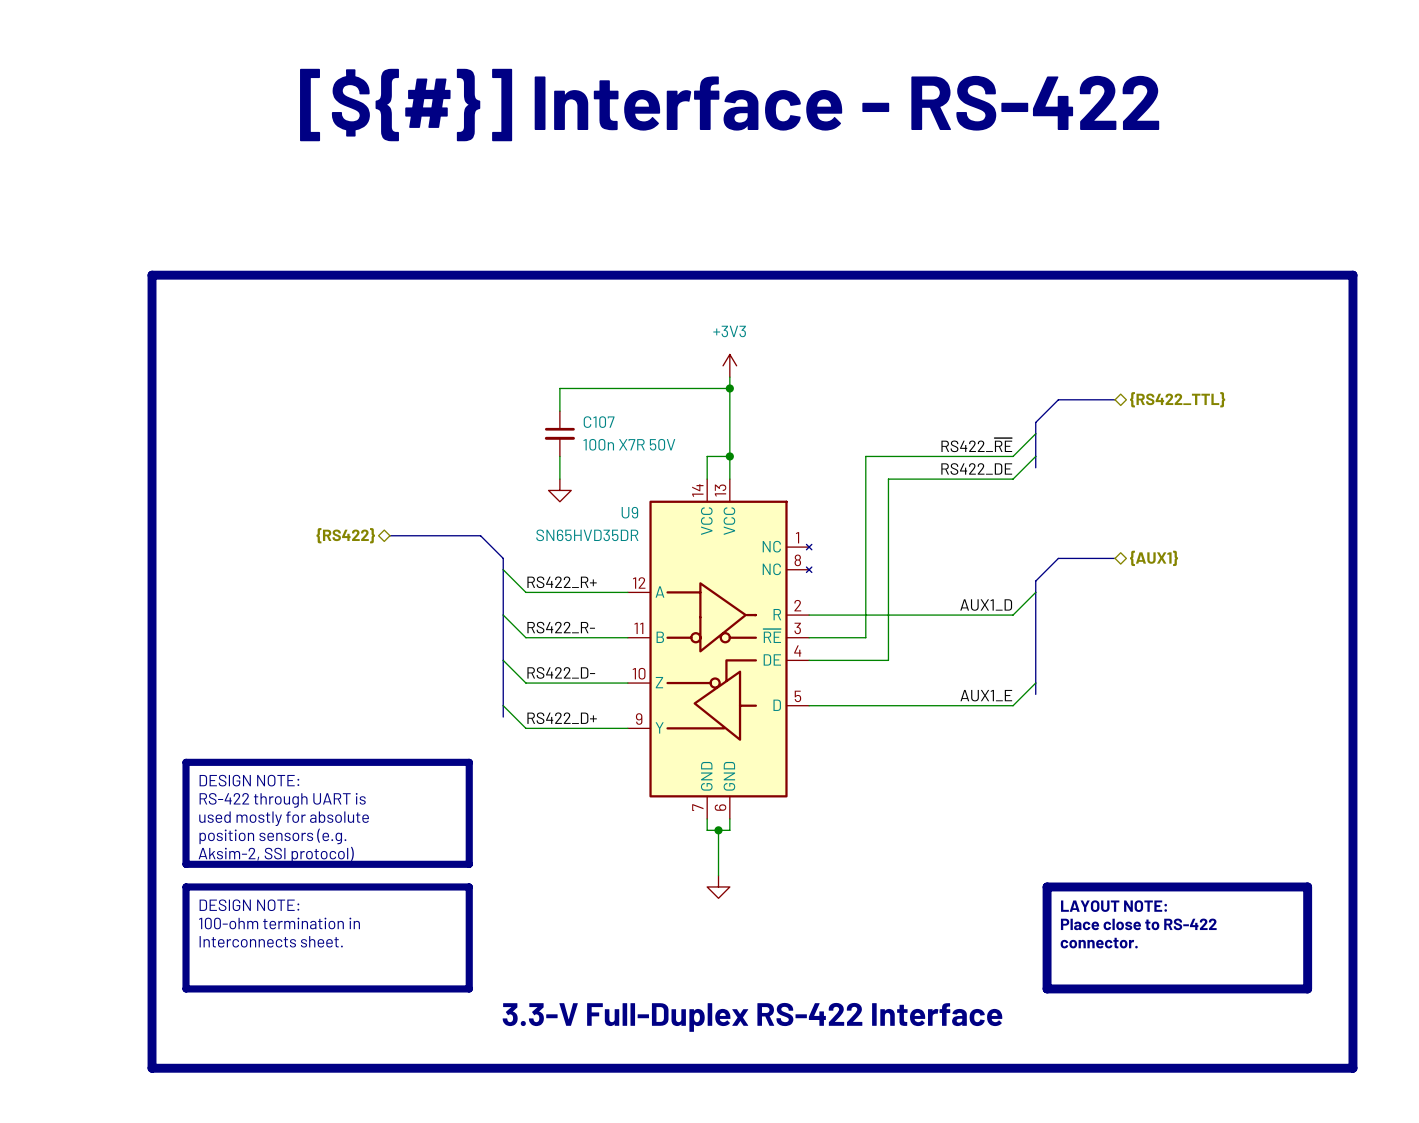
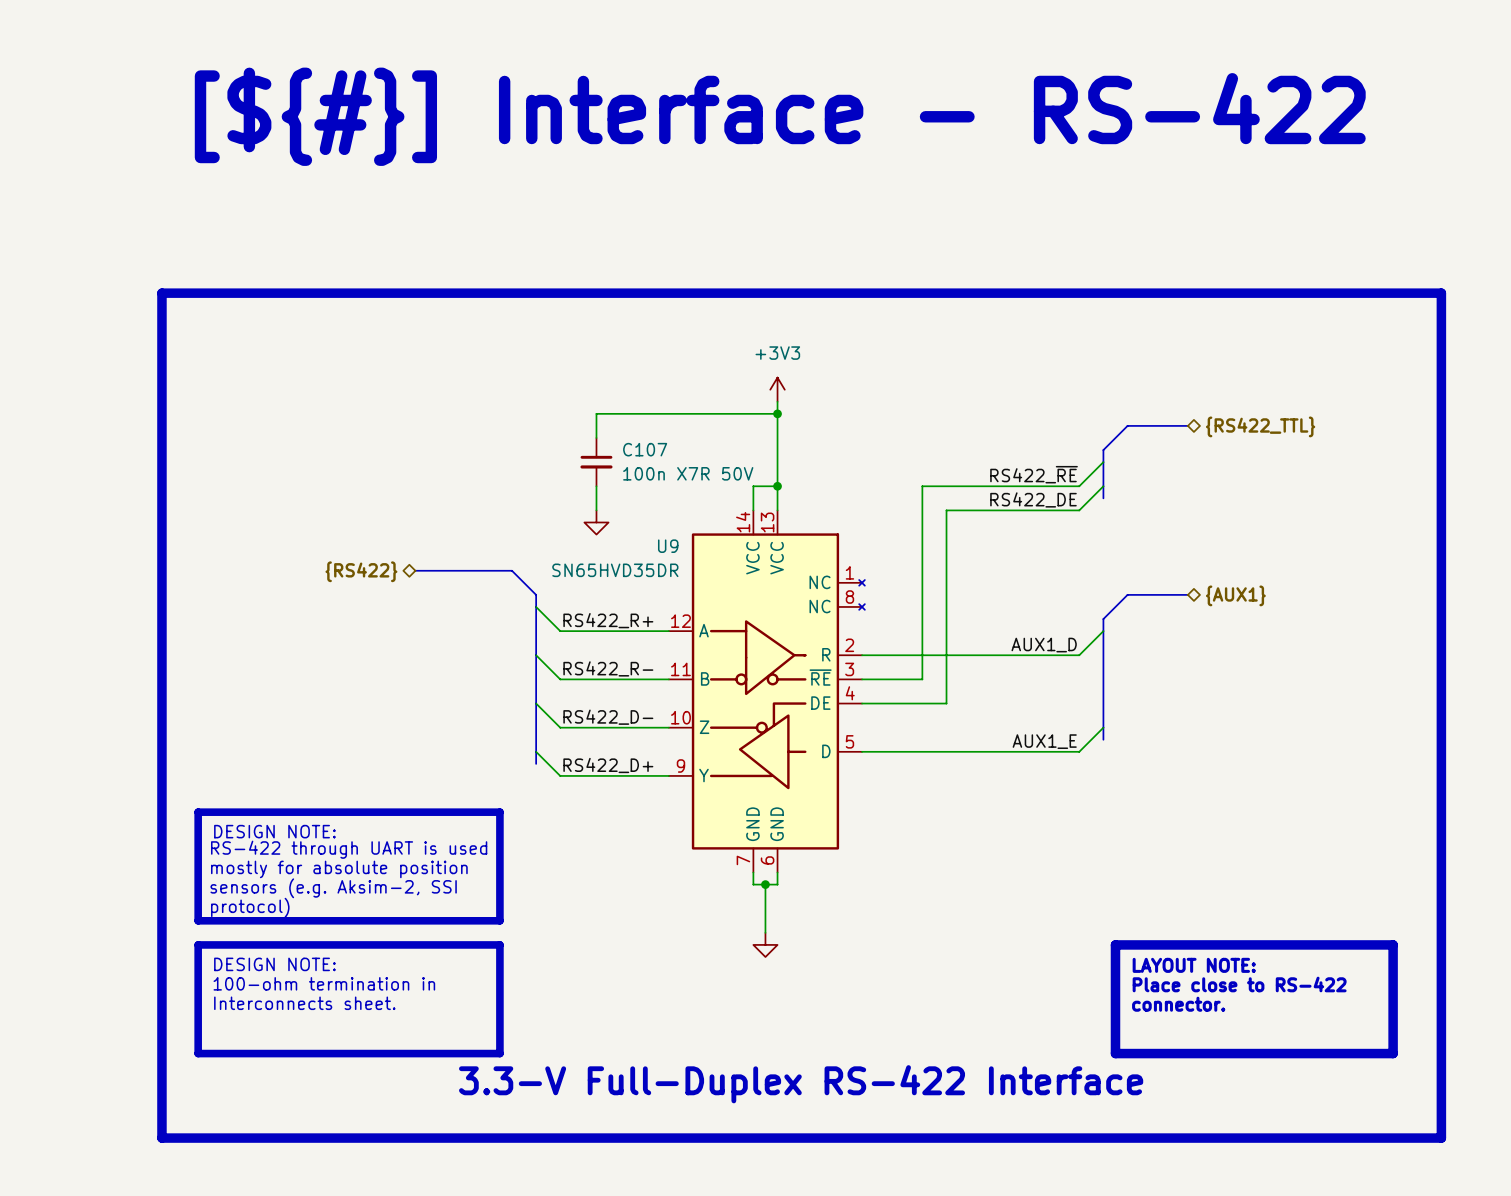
text: RS-422 through UART is (282, 800) -> RS-422 through UART is used (349, 849)
text: used mostly for absolute (284, 818) -> mostly for absolute position (339, 869)
text: position sensors (e.g. (272, 836) -> sensors (e.g. Aksim-2, SSI (333, 888)
text: Aksim-2, SSI protocol) (276, 854) -> protocol) (250, 907)

